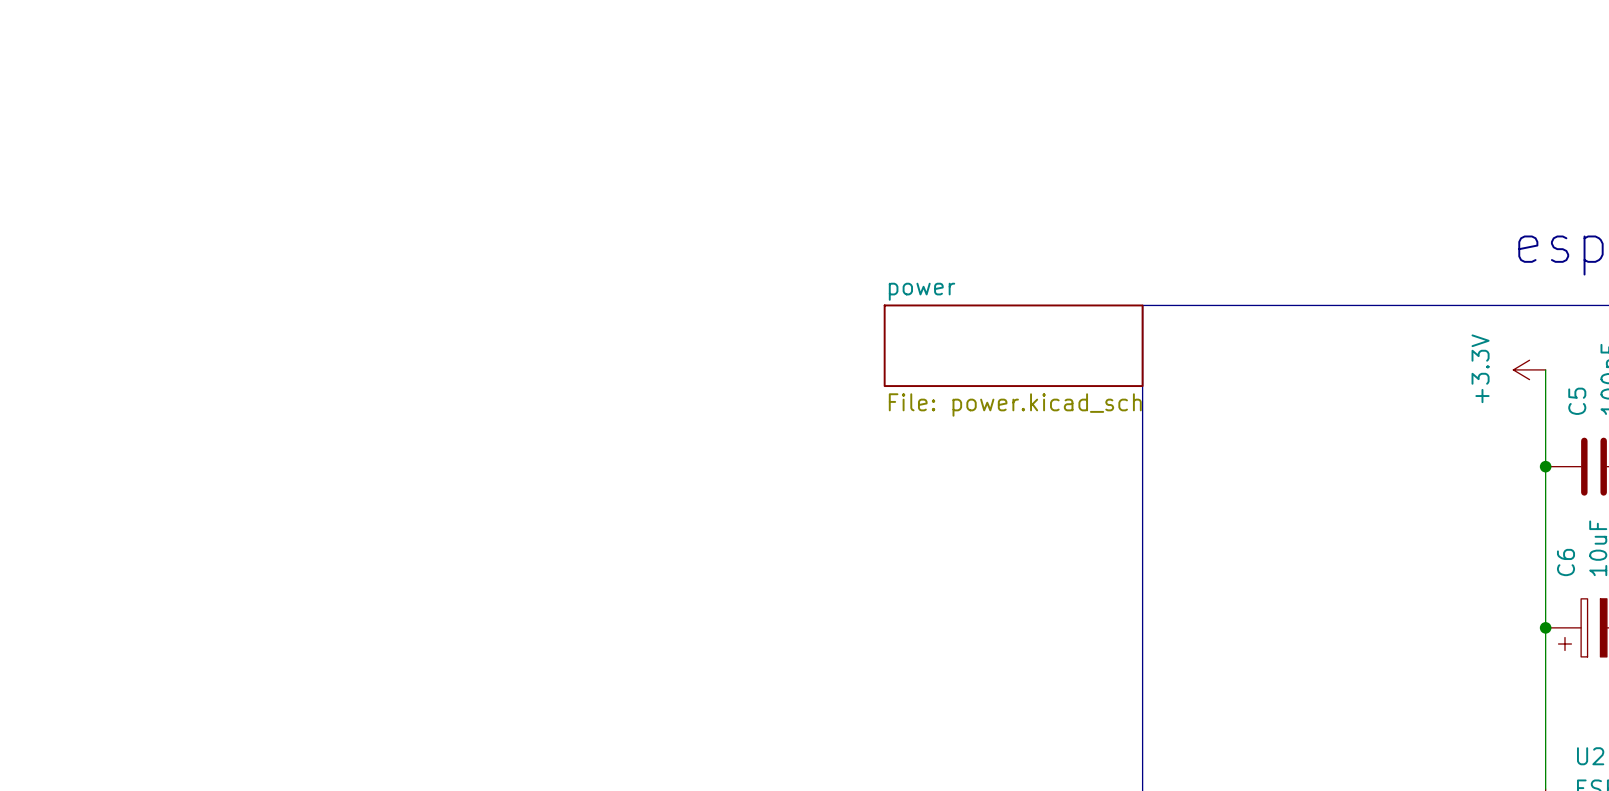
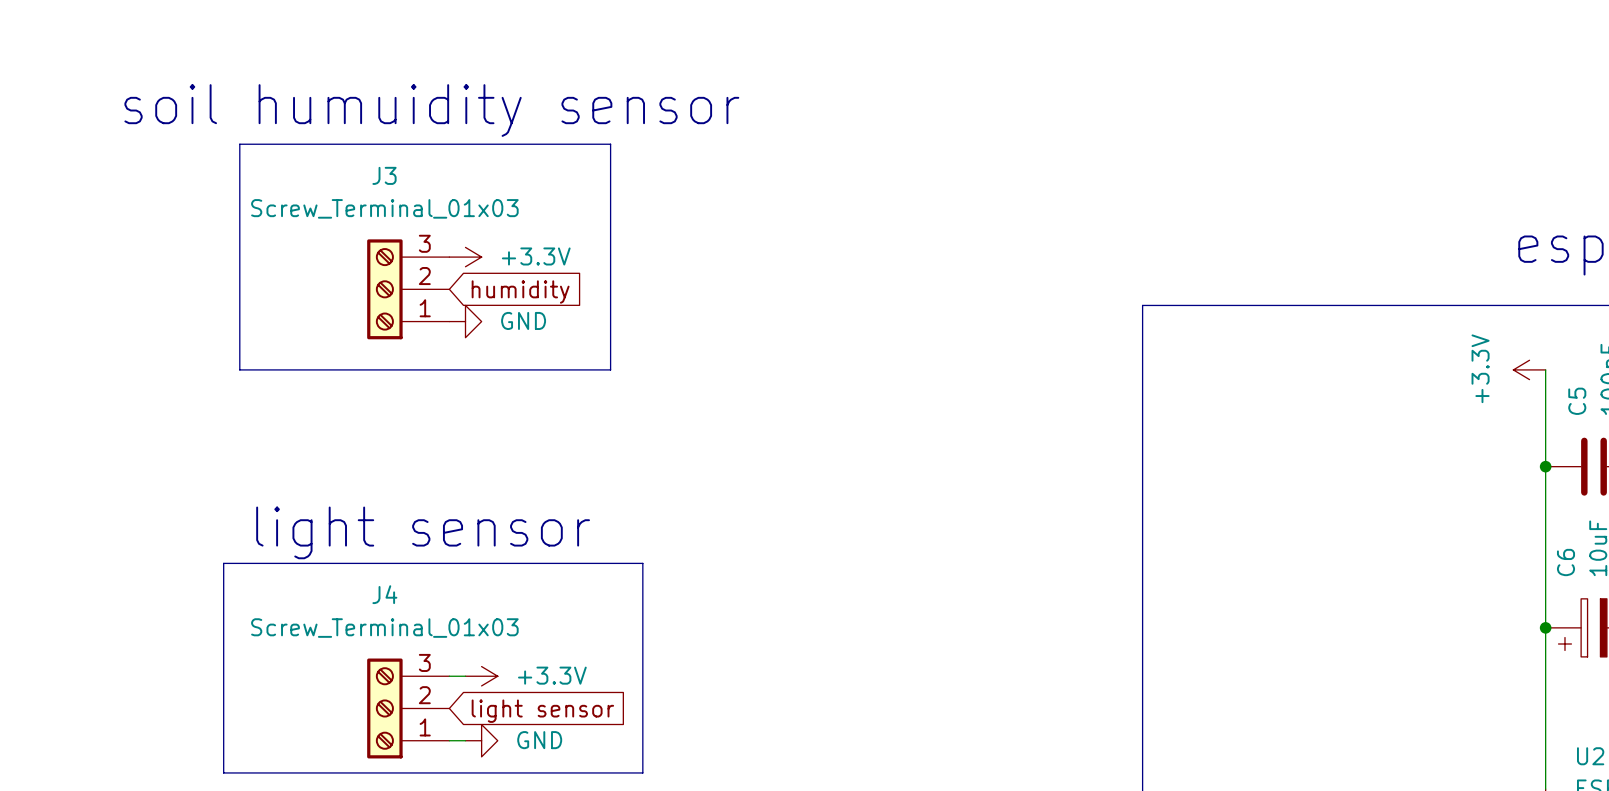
text: none -> soil humuidity sensor (431, 110)
line: none -> (239, 144) (610, 144) (610, 369) (239, 369) (239, 144)
power symbol: none -> +3.3V (465, 257)
J3: none -> Screw_Terminal_01x03 (408, 289)
global label: none -> humidity (520, 292)
power symbol: none -> GND (465, 321)
sheet power: File: power.kicad_sch (1013, 345) -> none
text: none -> light sensor (423, 532)
line: none -> (223, 563) (642, 563) (642, 772) (223, 772) (223, 563)
wire: none -> (449, 676) (465, 676)
power symbol: none -> +3.3V (481, 676)
J4: none -> Screw_Terminal_01x03 (408, 708)
global label: none -> light sensor (542, 711)
wire: none -> (449, 740) (465, 740)
power symbol: none -> GND (481, 740)

